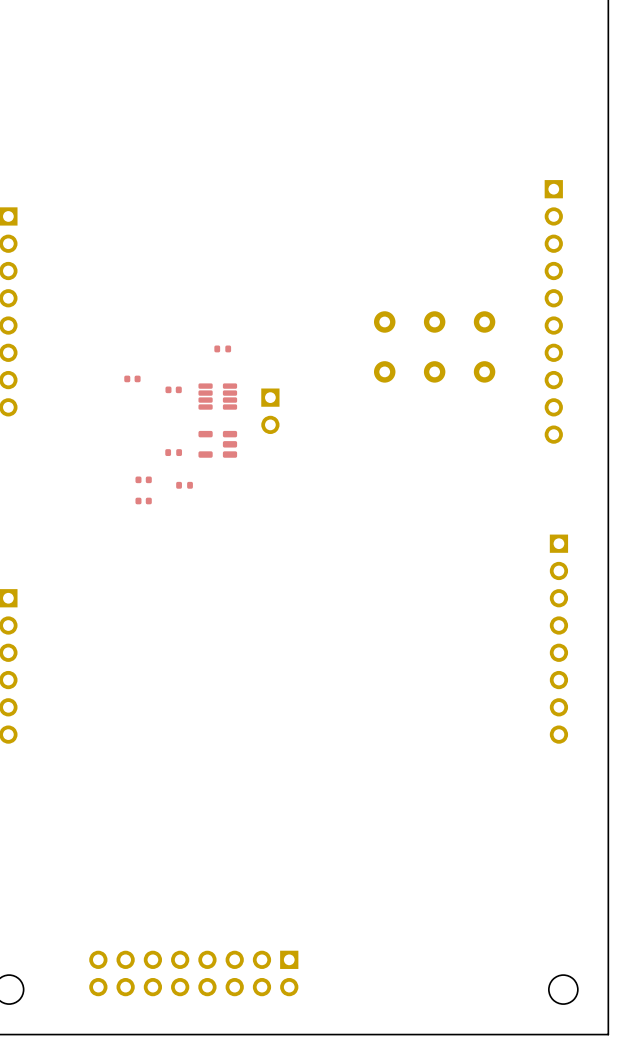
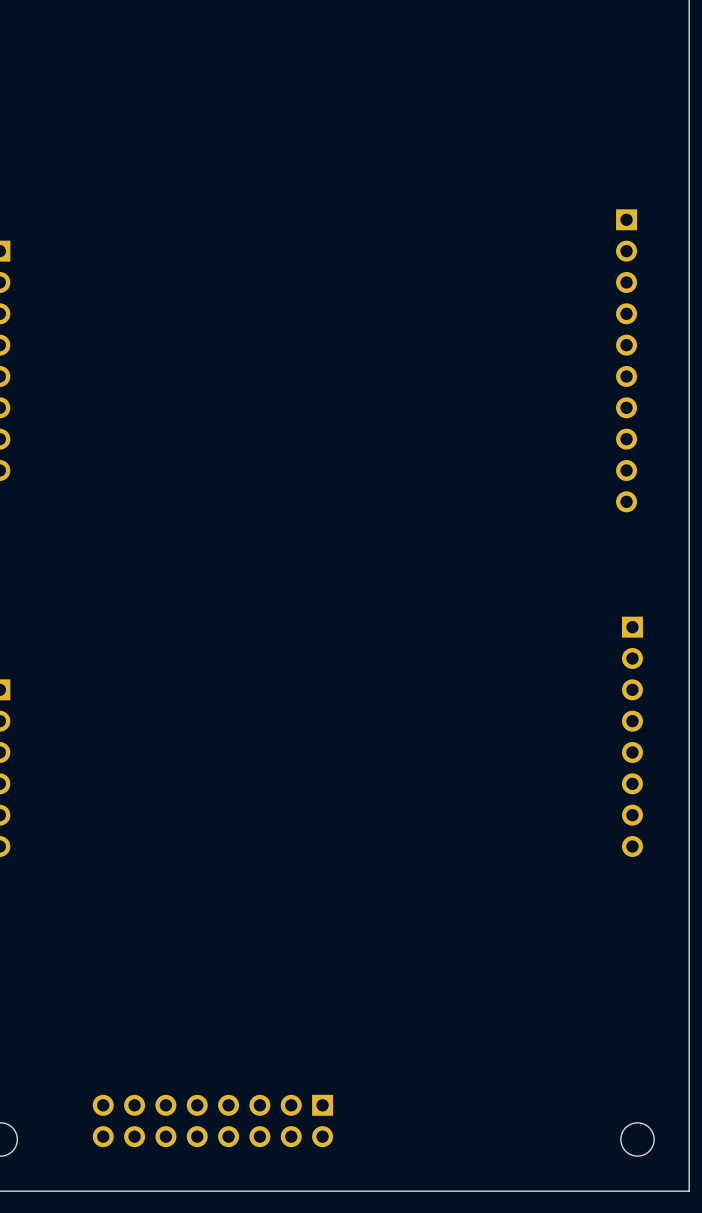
part: (384, 321) -> none
part: (434, 321) -> none
part: (484, 321) -> none
part: (222, 348) -> none
part: (384, 371) -> none
part: (434, 371) -> none
part: (484, 371) -> none
part: (132, 378) -> none
part: (173, 389) -> none
part: (217, 396) -> none
part: (270, 411) -> none
part: (217, 444) -> none
part: (173, 452) -> none
part: (143, 479) -> none
part: (184, 485) -> none
part: (143, 500) -> none

